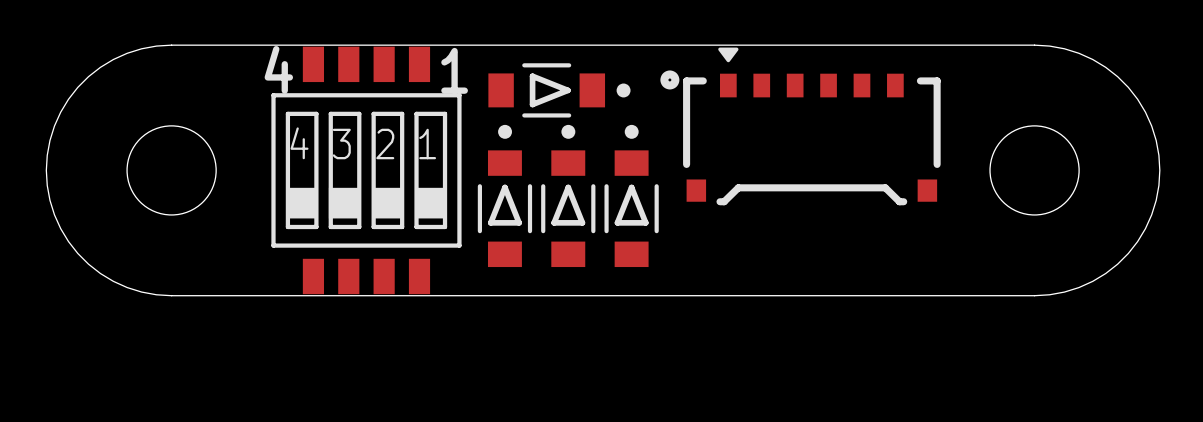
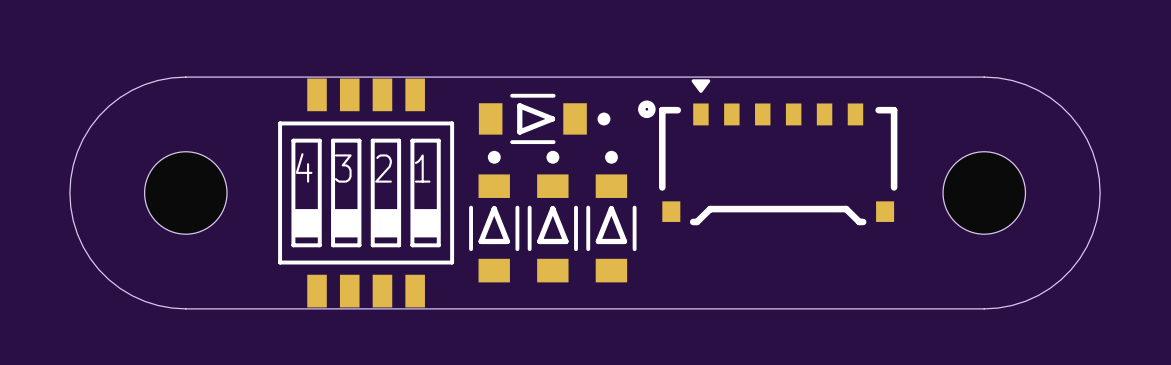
text: 4 (278, 69) -> none
text: 1 (454, 70) -> none

